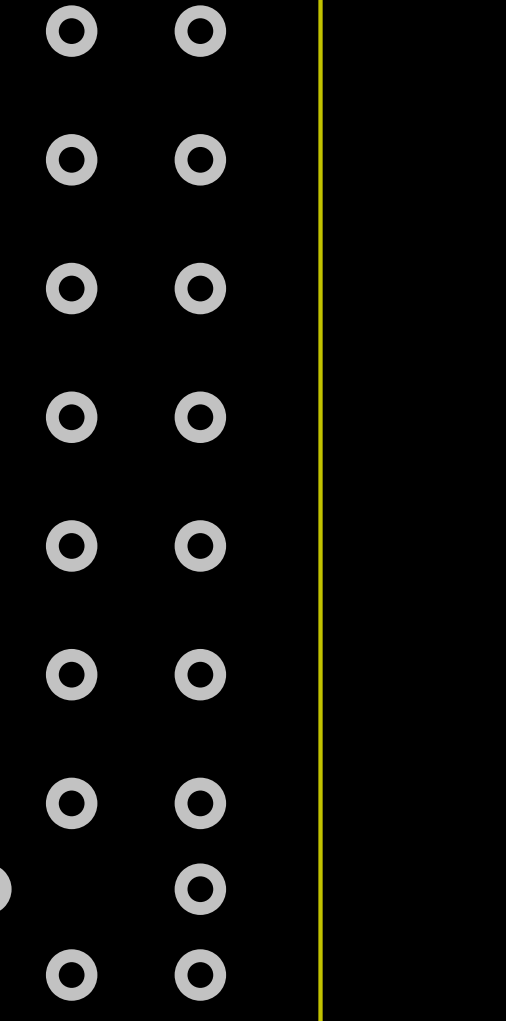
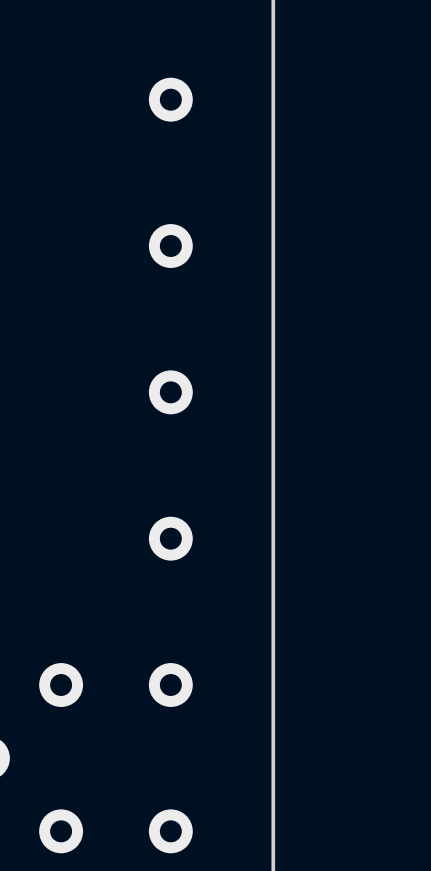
via: (71, 31) -> none
via: (200, 31) -> none
via: (71, 159) -> none
via position: (200, 159) -> (170, 99)
via: (71, 288) -> none
via: (71, 417) -> none
via position: (200, 417) -> (170, 392)
via: (71, 545) -> none
via: (200, 545) -> none
via: (71, 674) -> none
via position: (200, 674) -> (170, 538)
via: (200, 889) -> none

